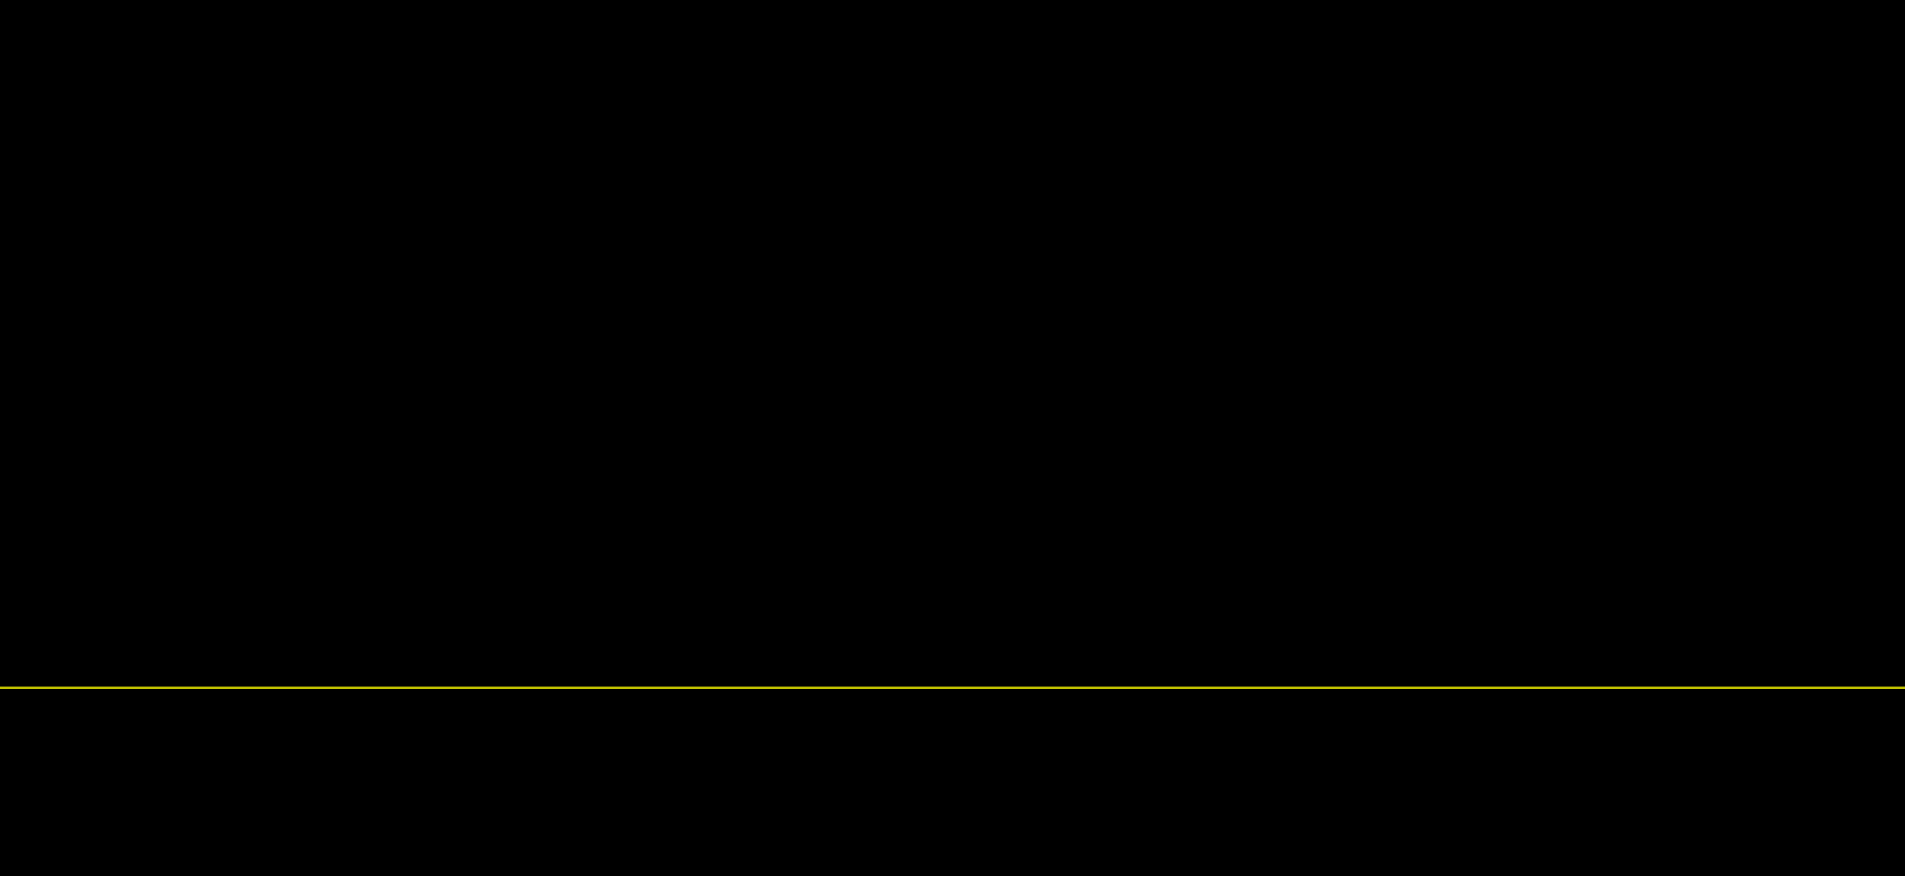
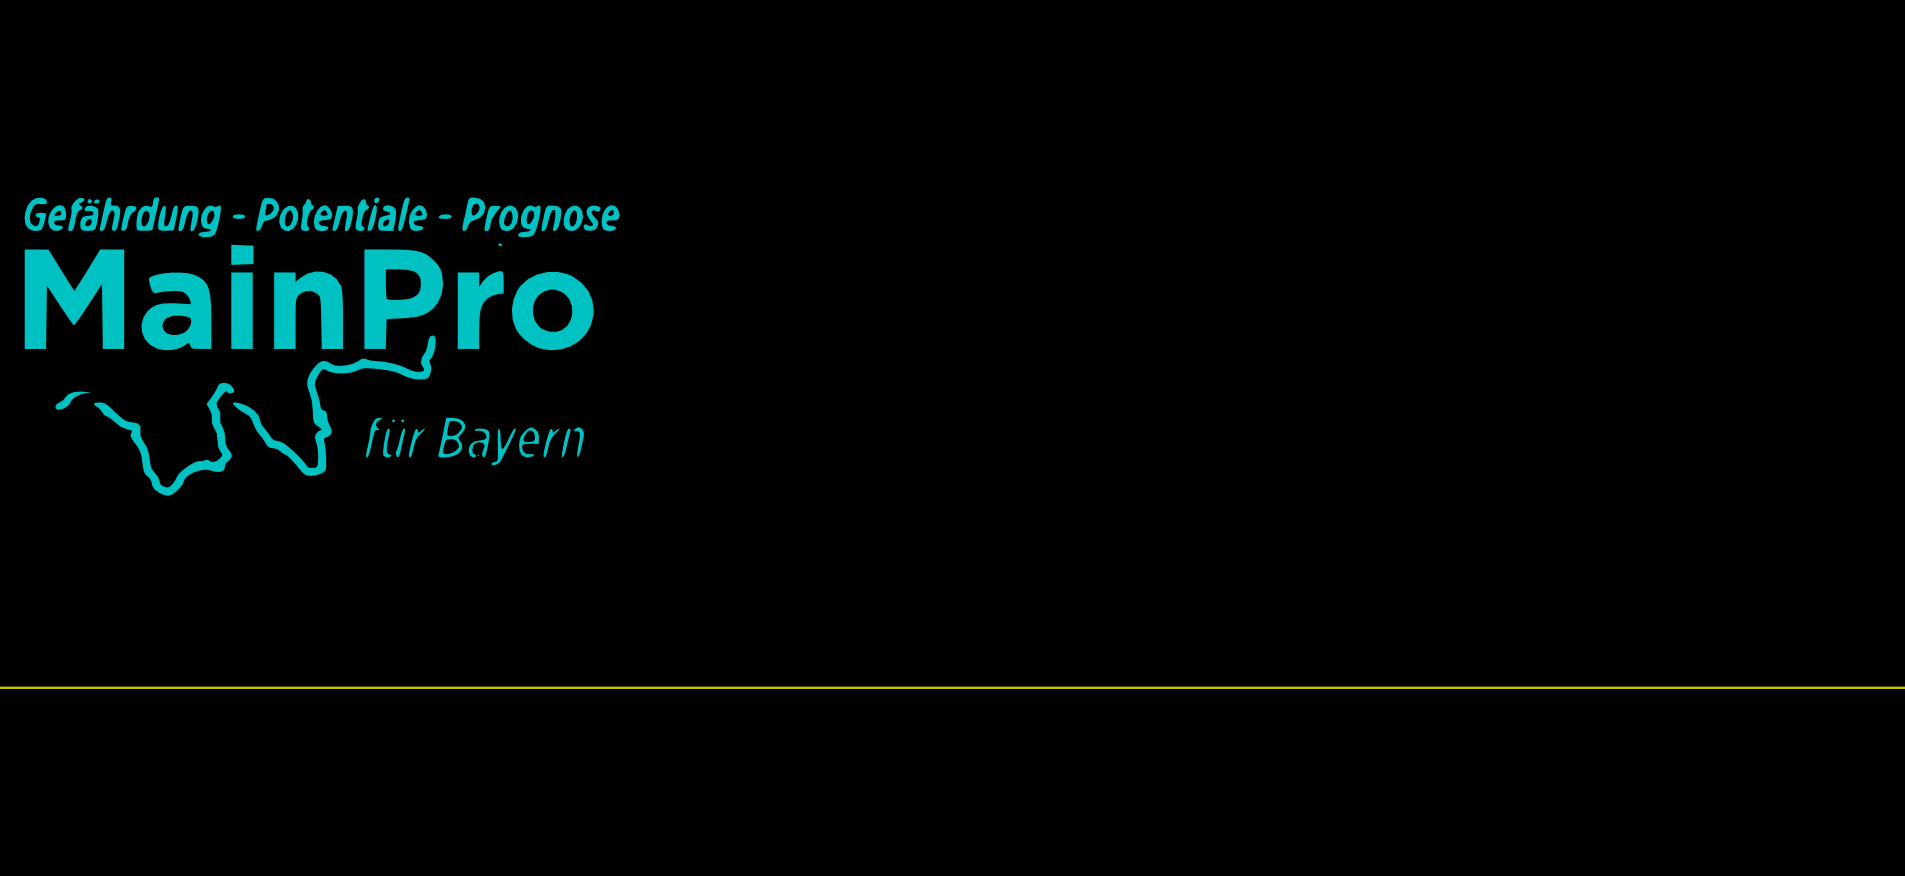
drawing: none -> [24, 197, 620, 496]

